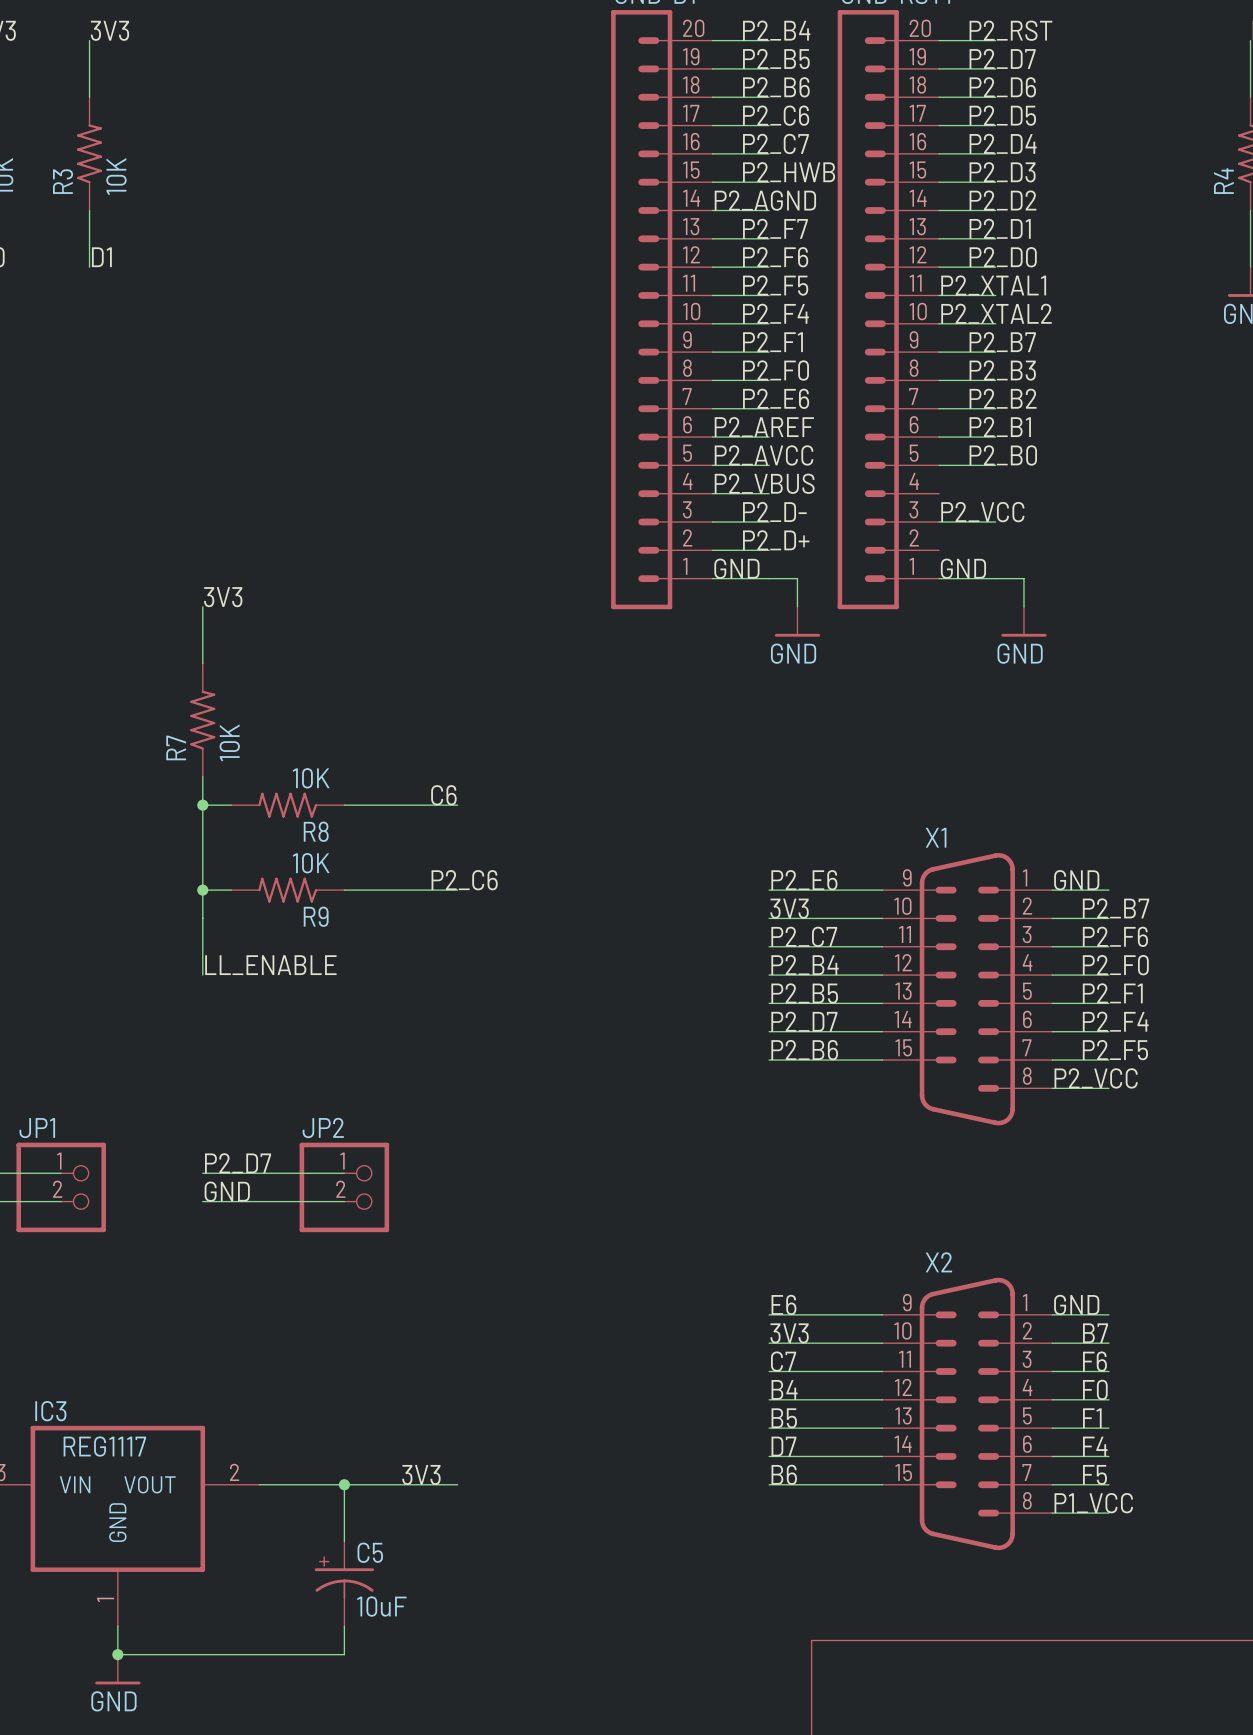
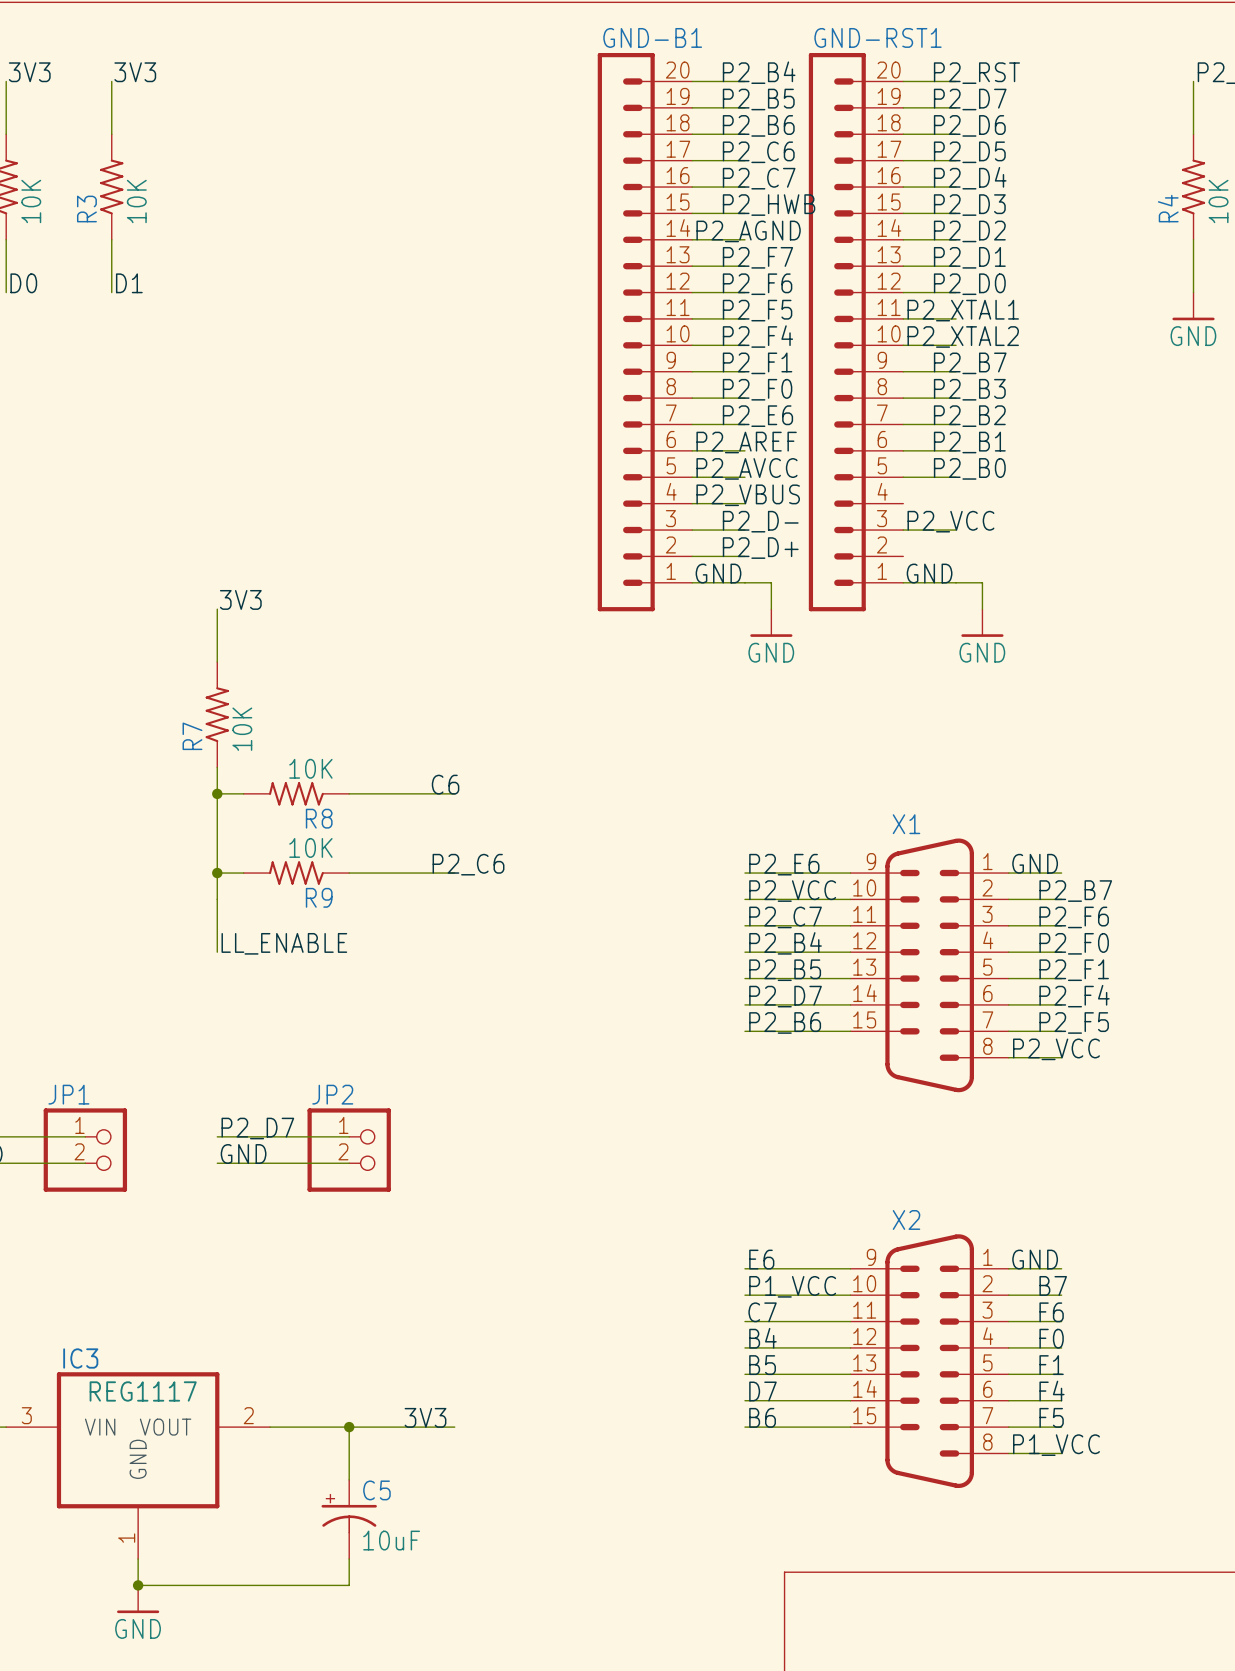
label: 3V3 (789, 908) -> P2_VCC (792, 891)
label: 3V3 (789, 1333) -> P1_VCC (792, 1286)

